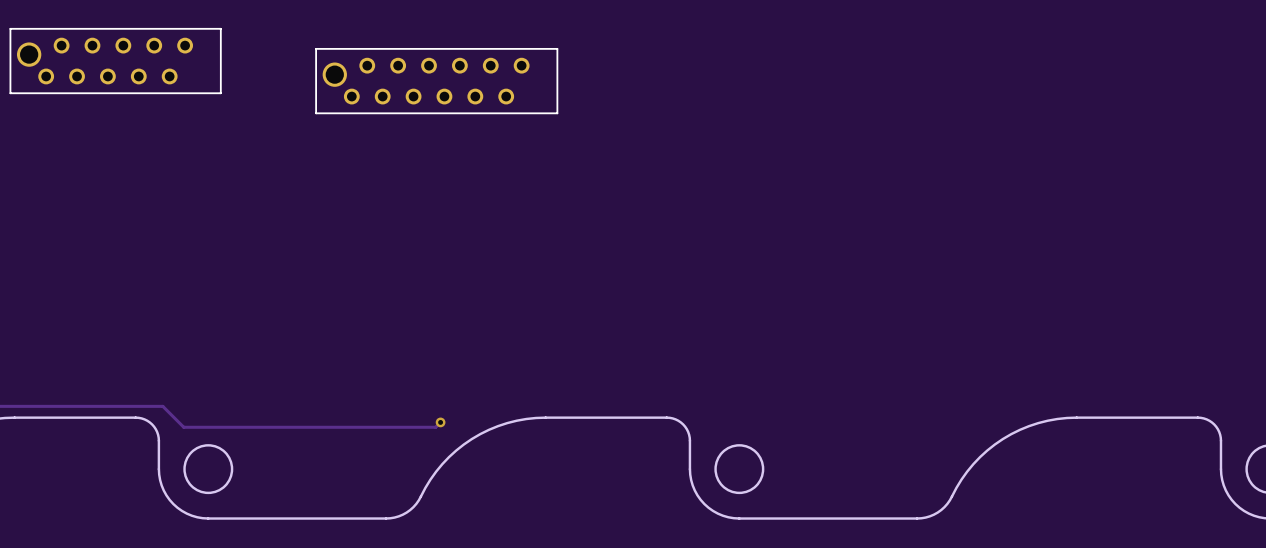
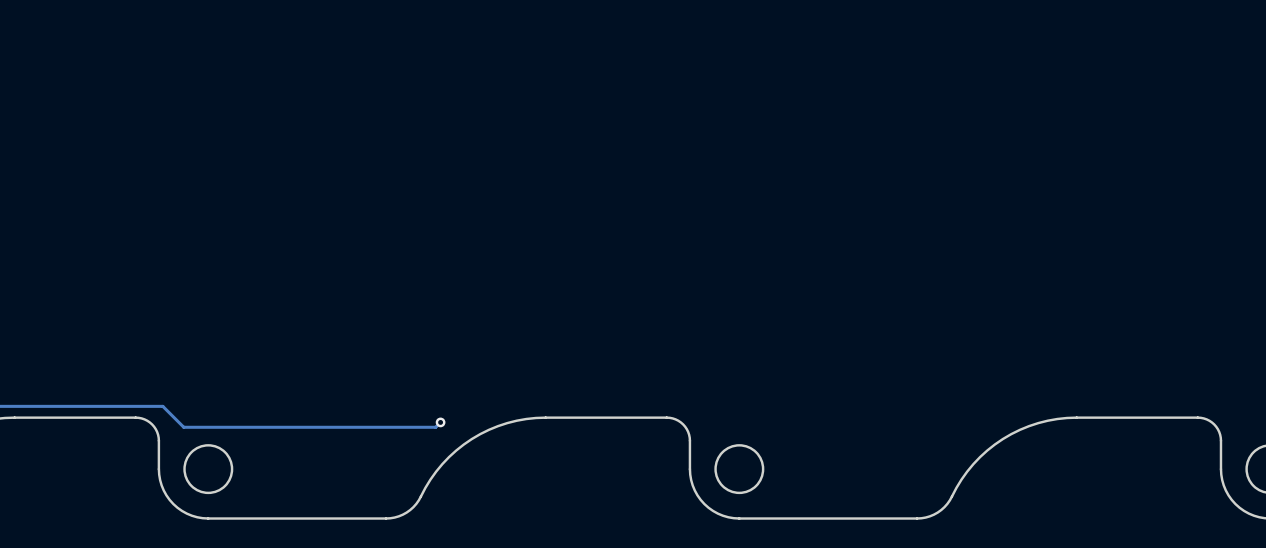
part: (115, 61) -> none
part: (436, 81) -> none

